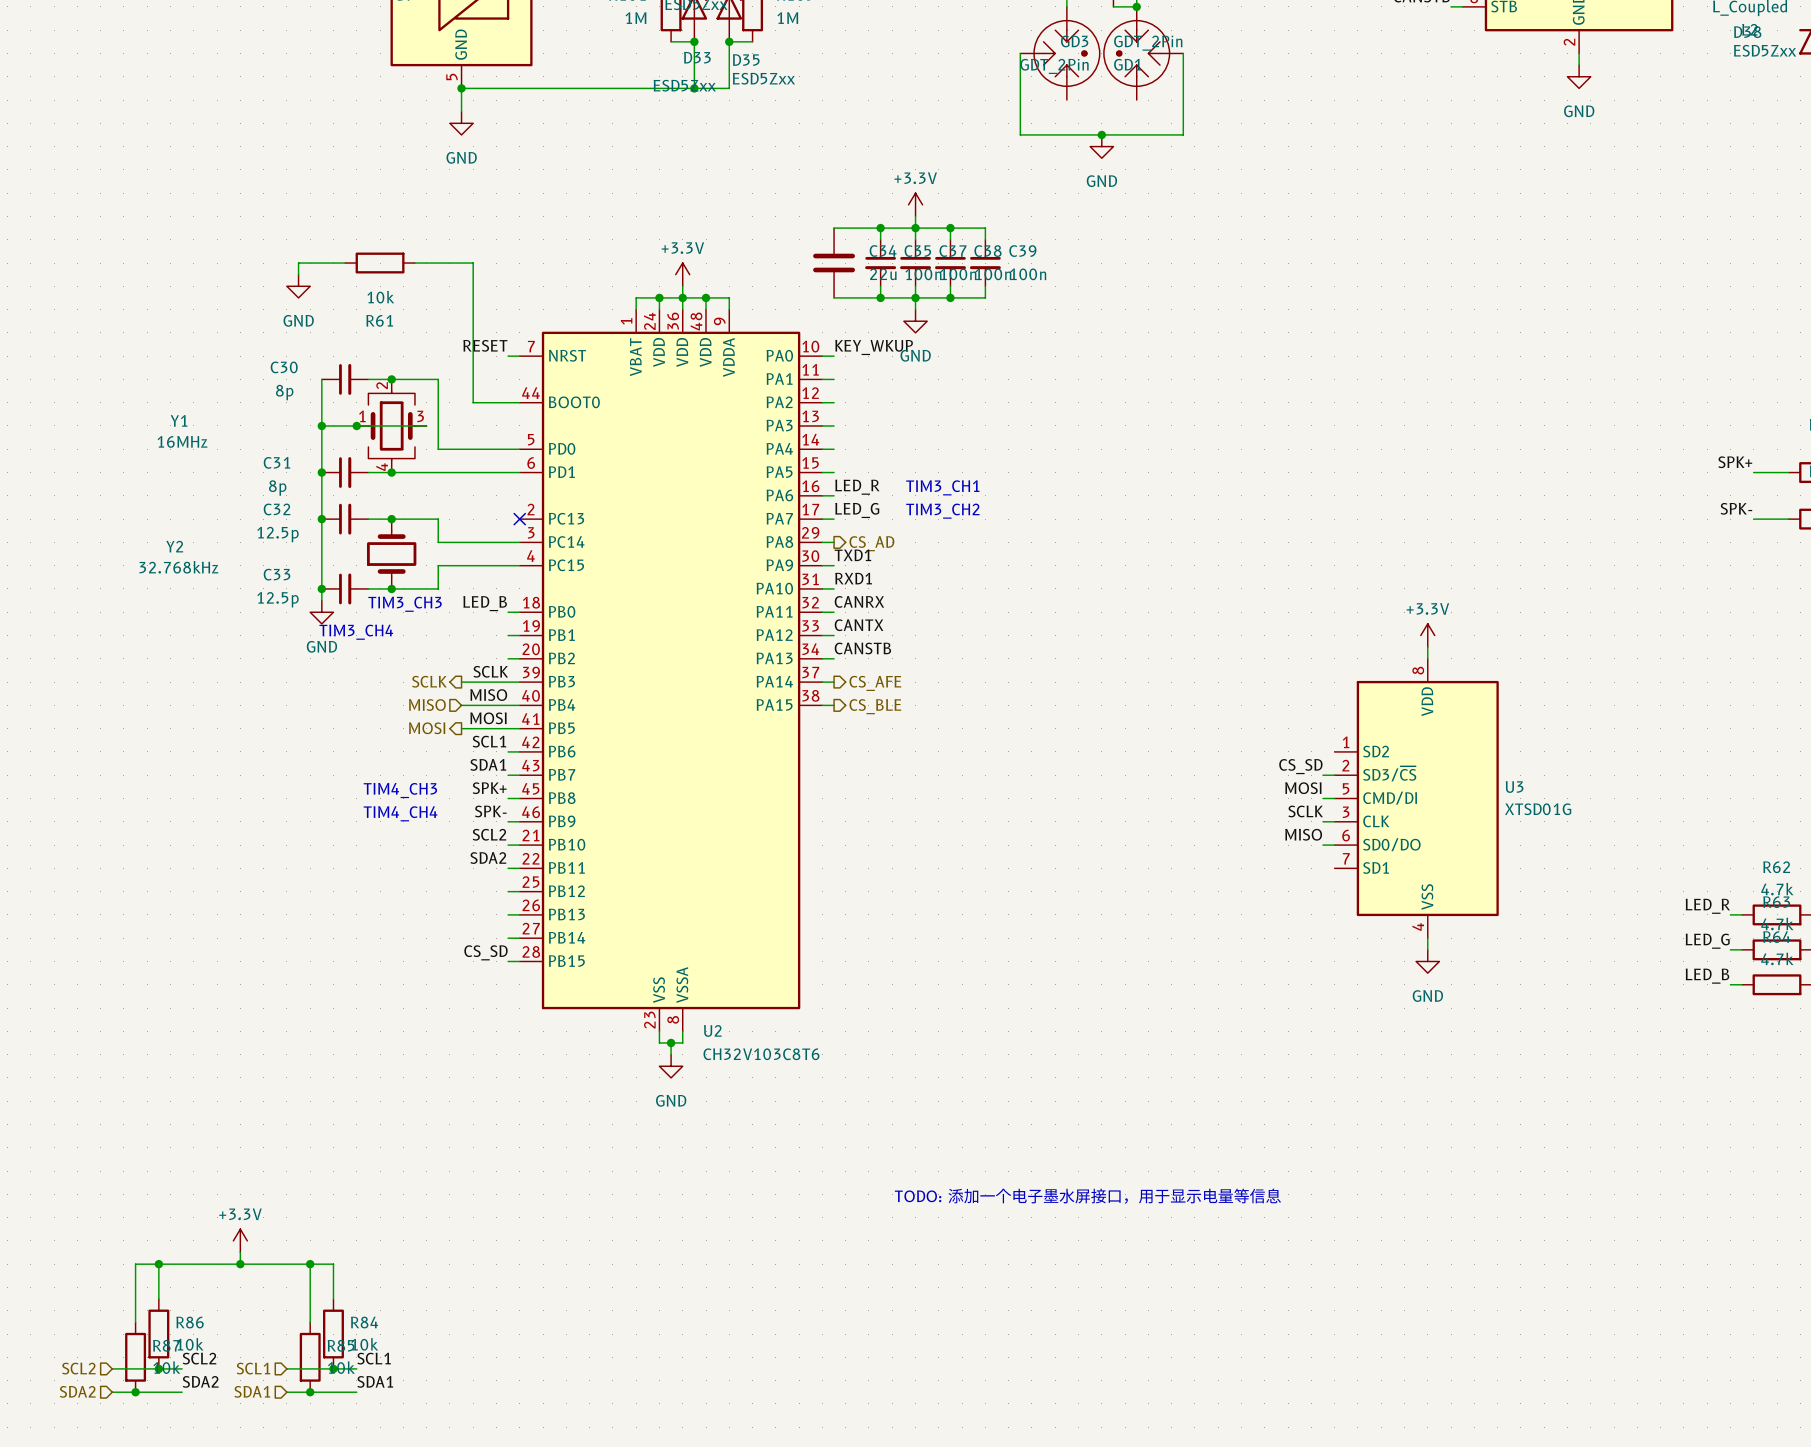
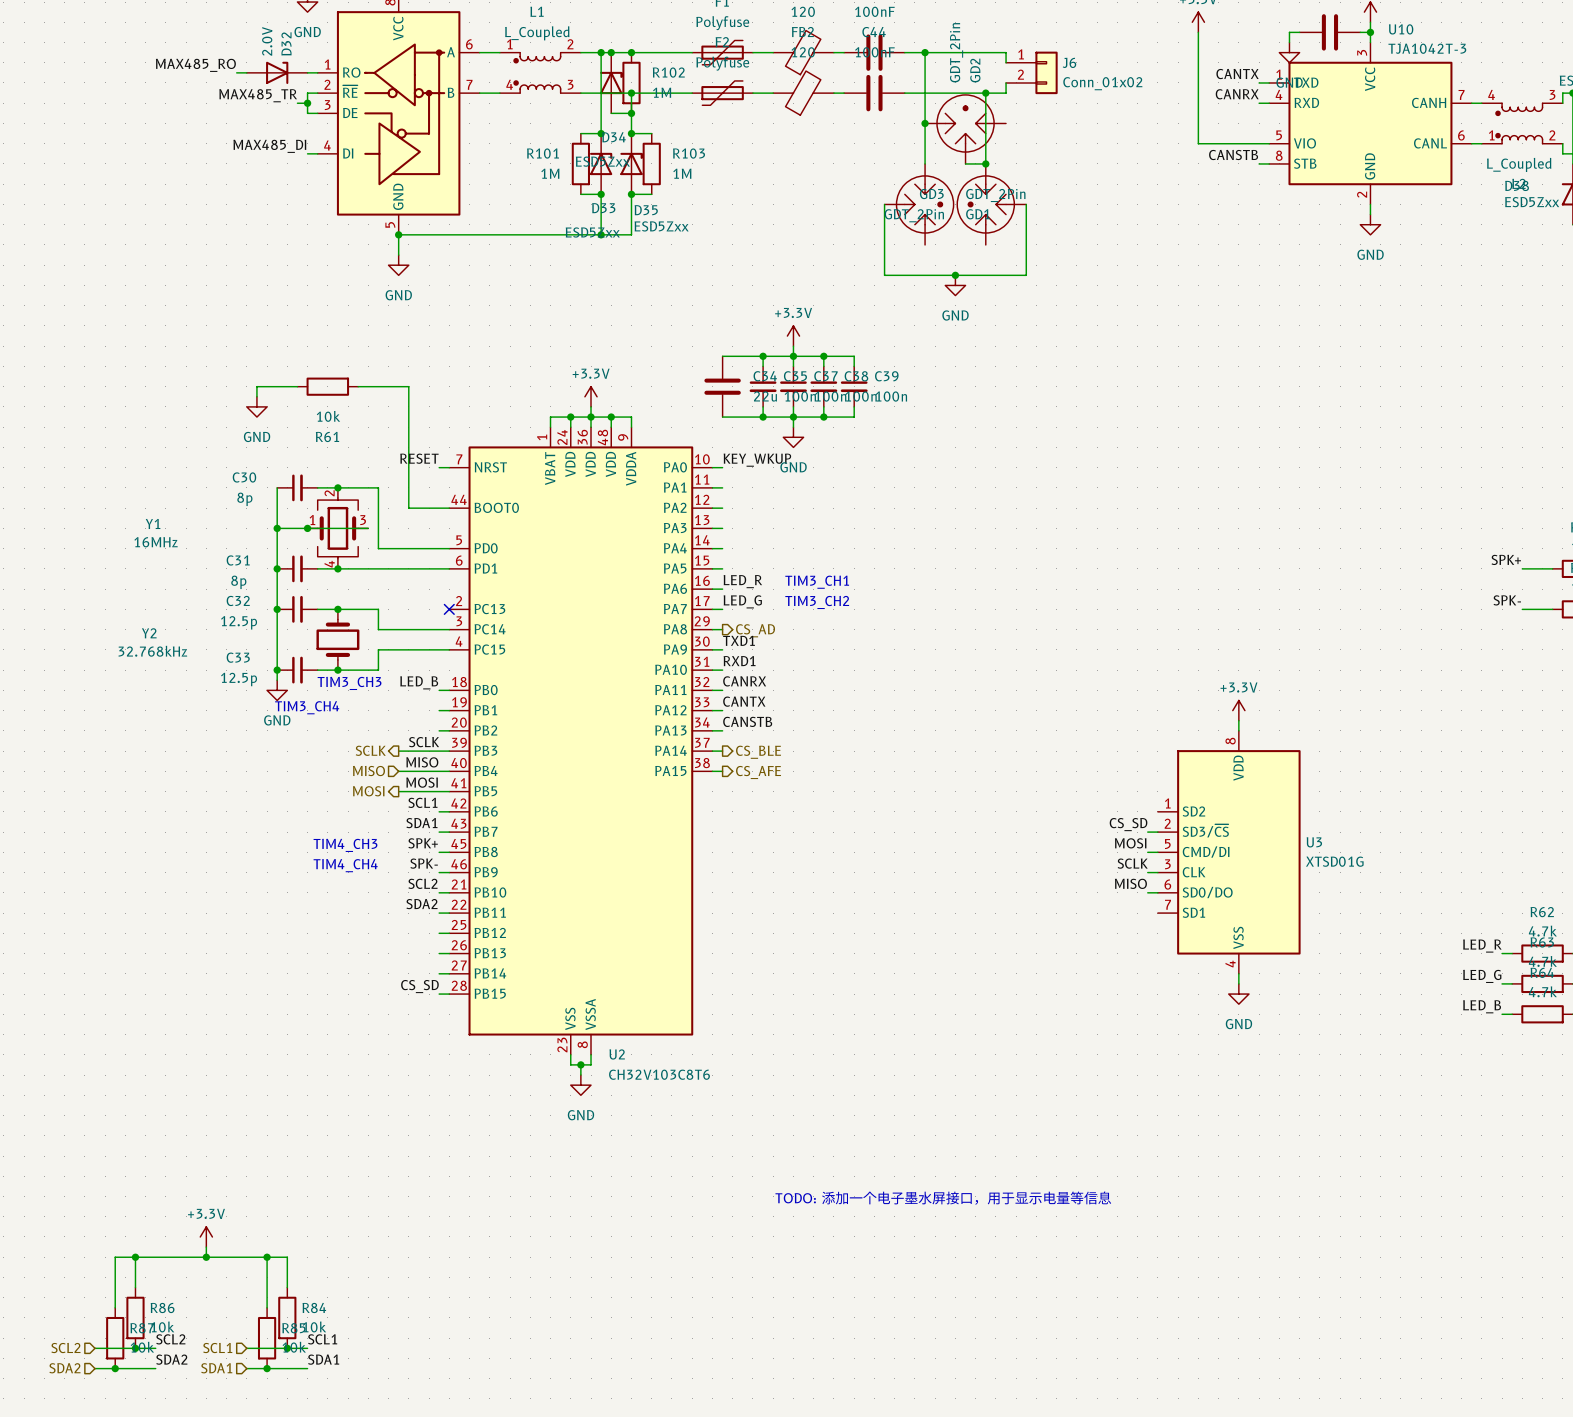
hierarchical label: CS_AFE (875, 683) -> CS_BLE (758, 752)
hierarchical label: CS_BLE (875, 706) -> CS_AFE (758, 772)

